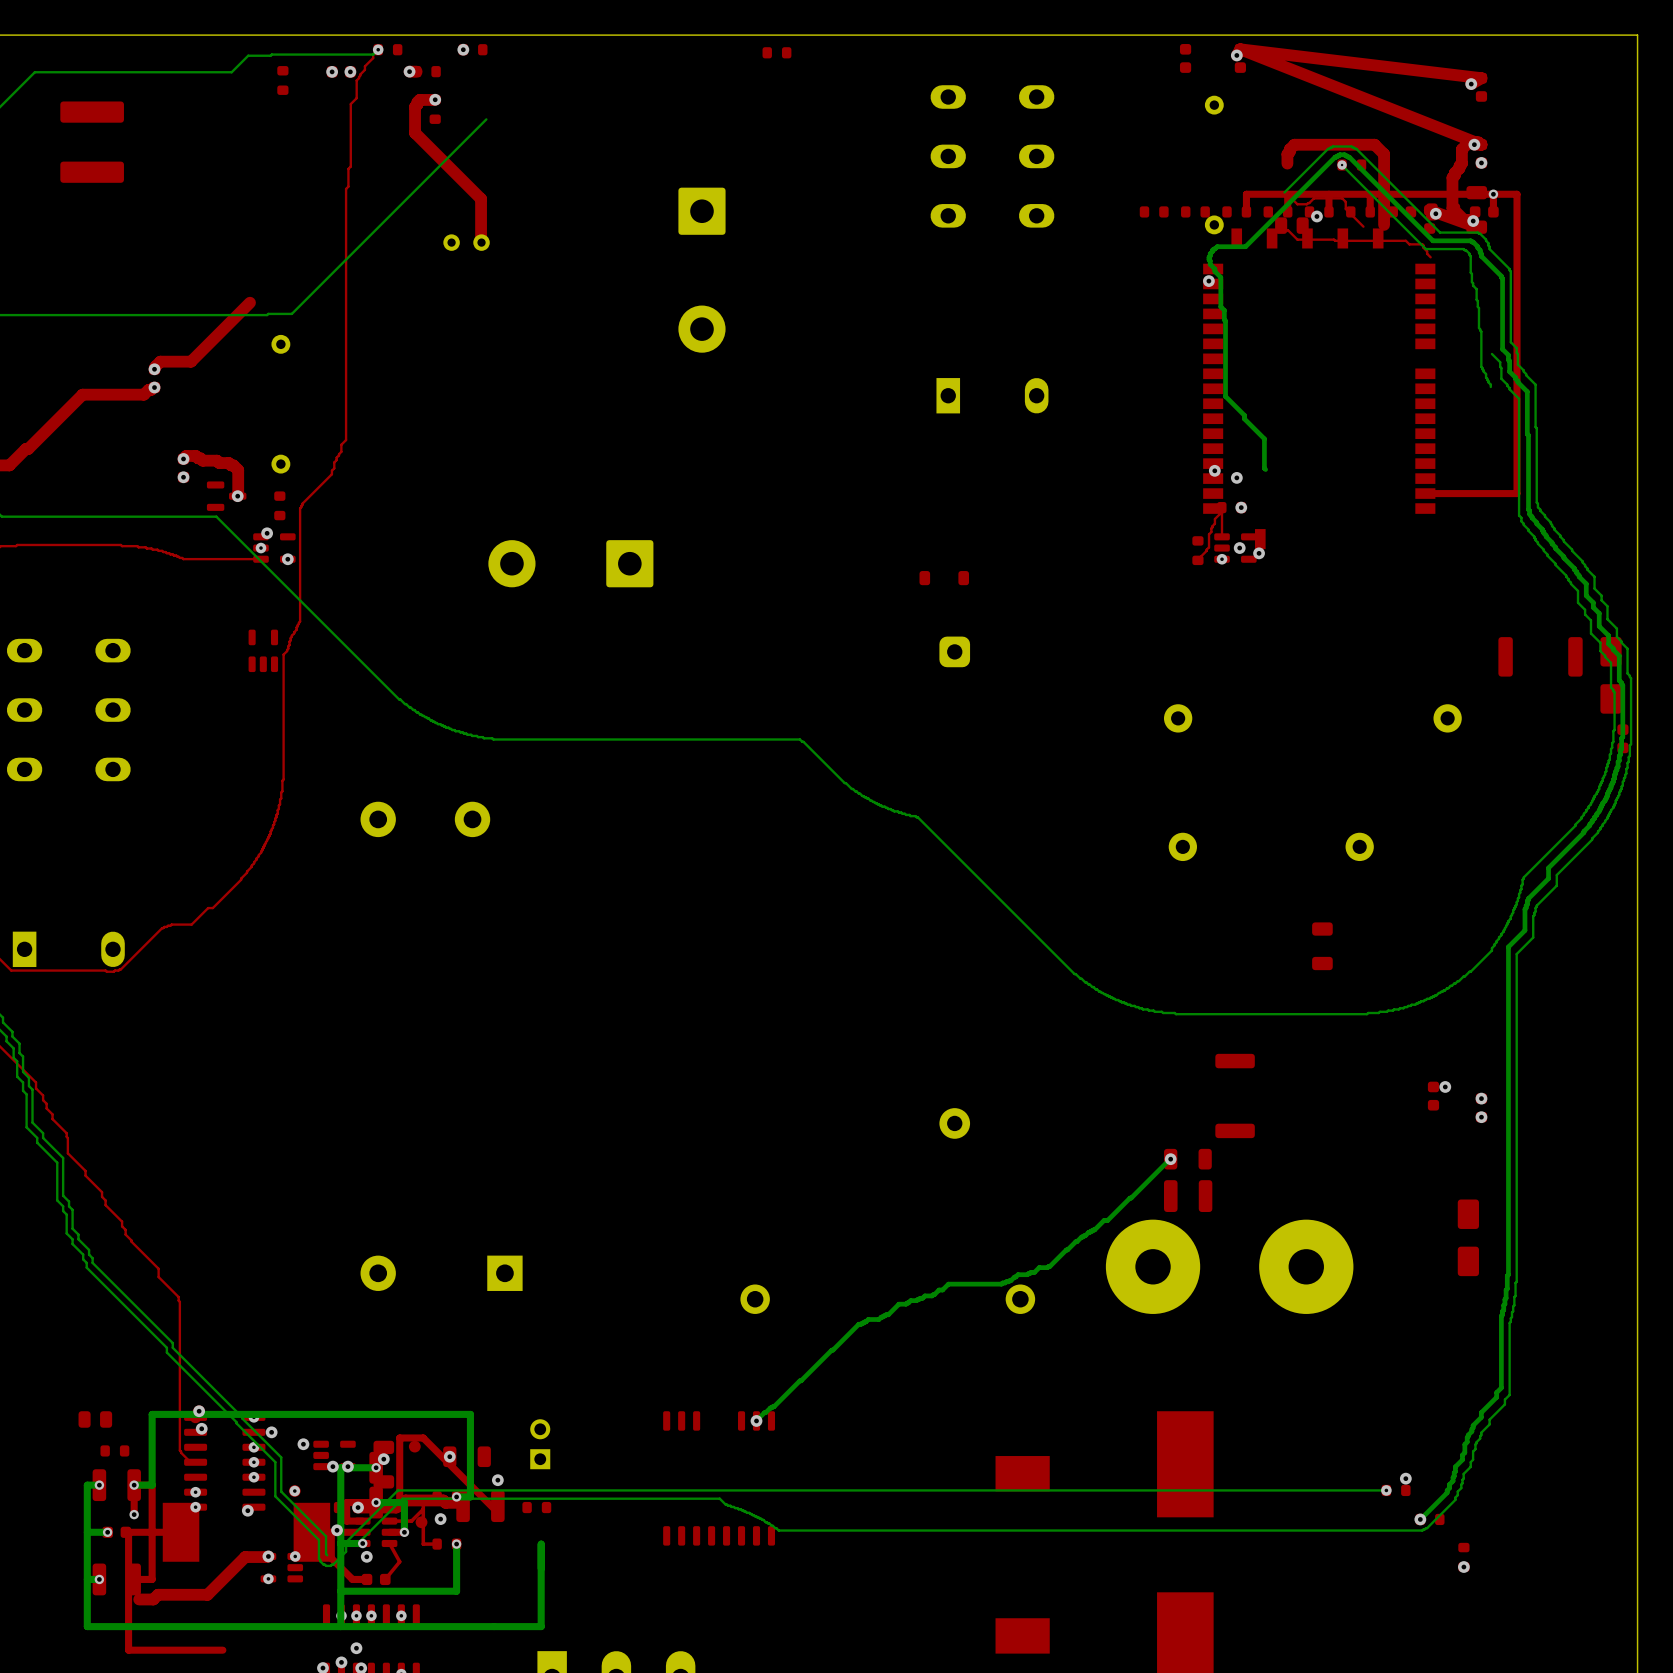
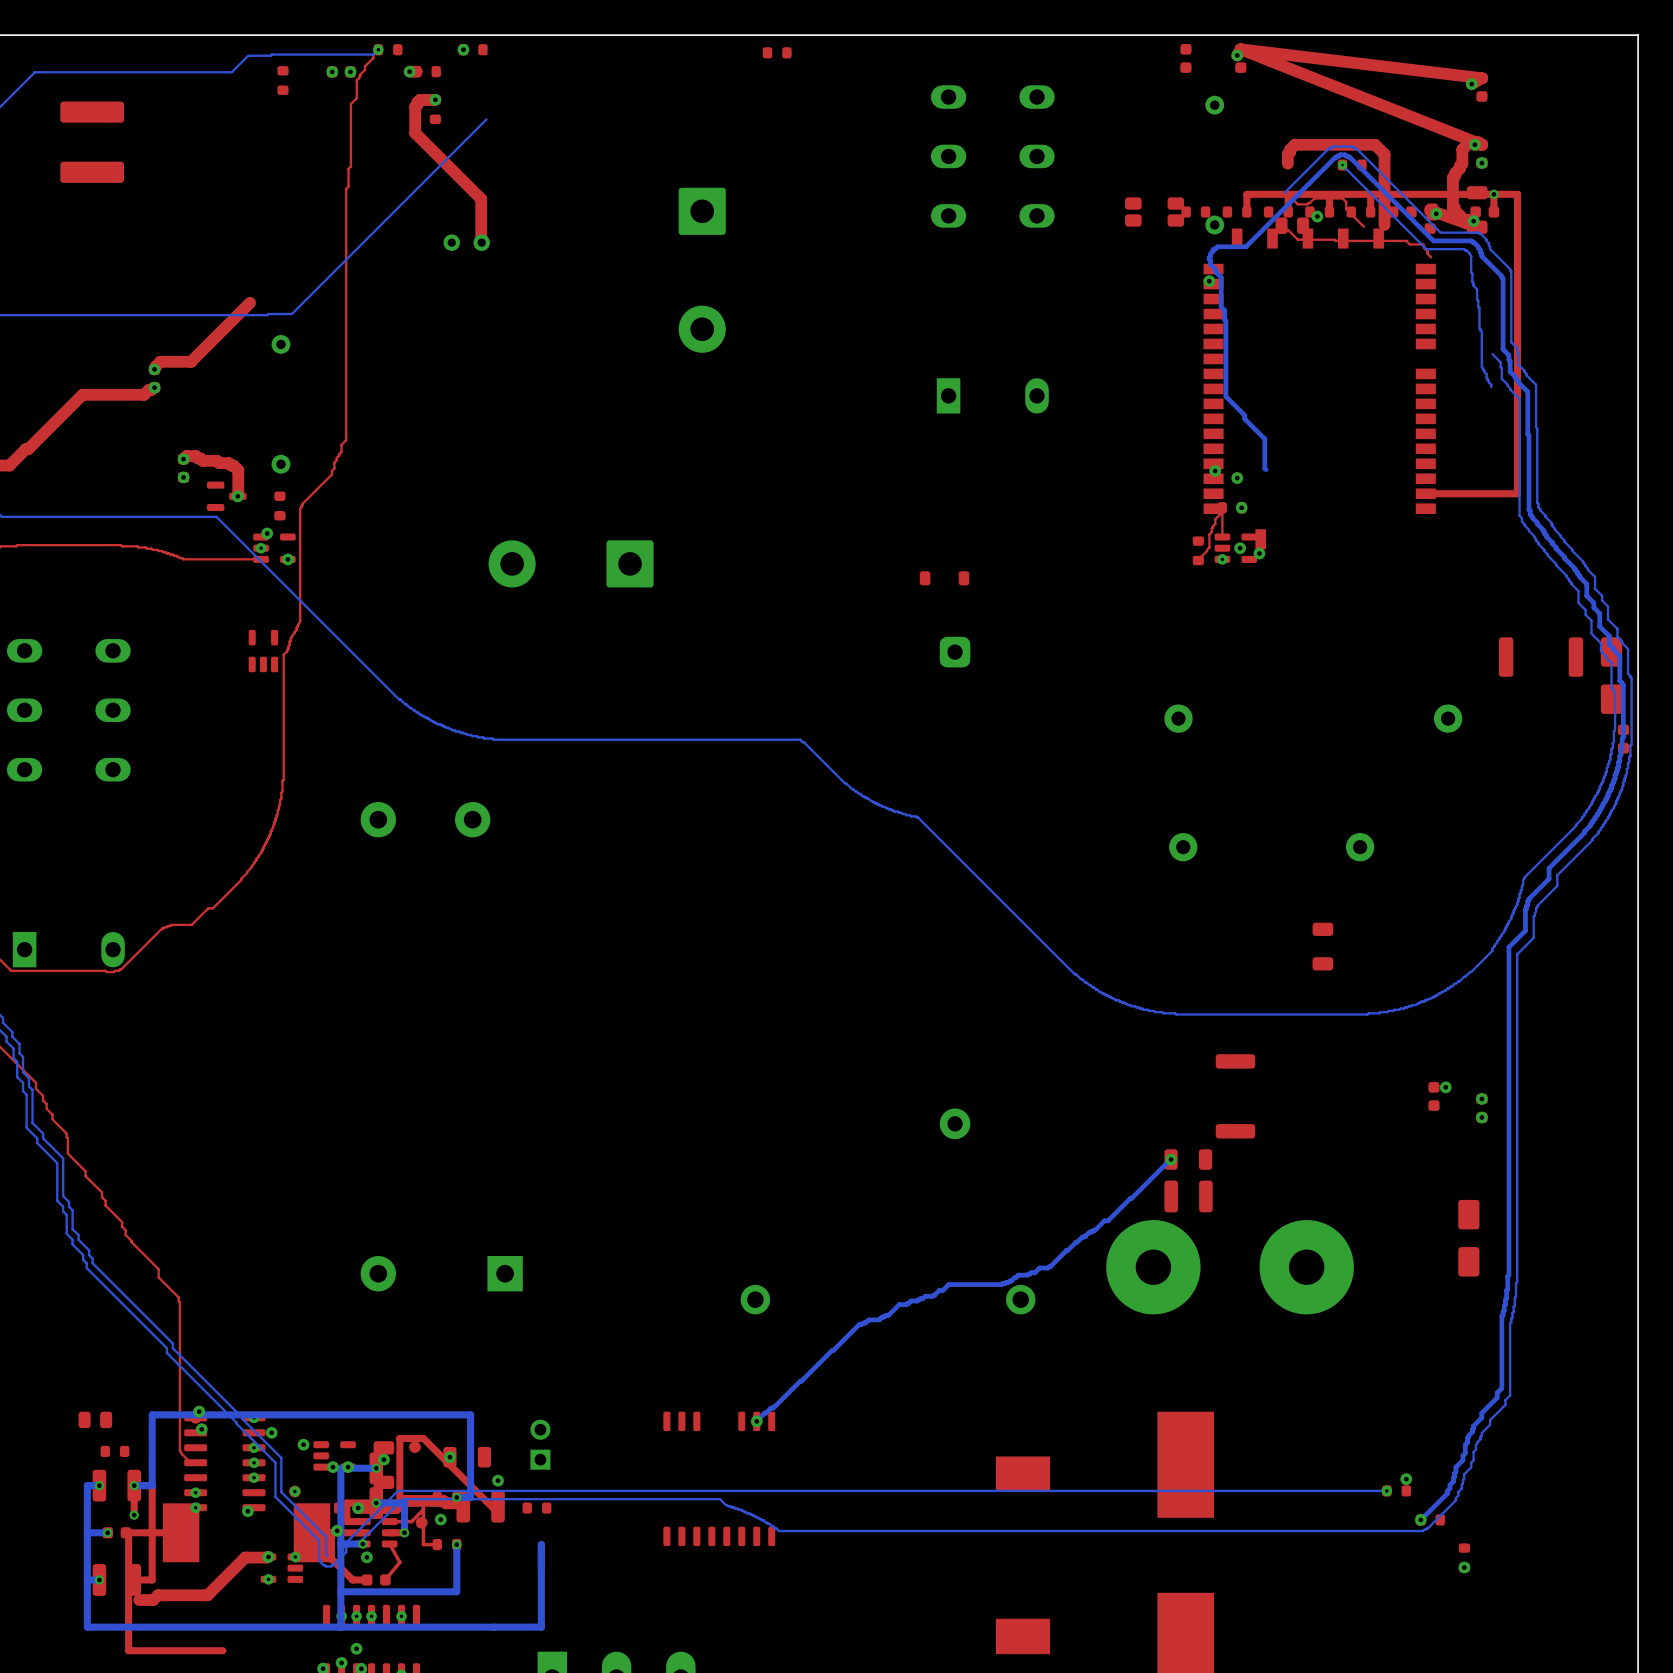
part footprint: [1139, 206, 1169, 218] -> [1125, 197, 1185, 227]

